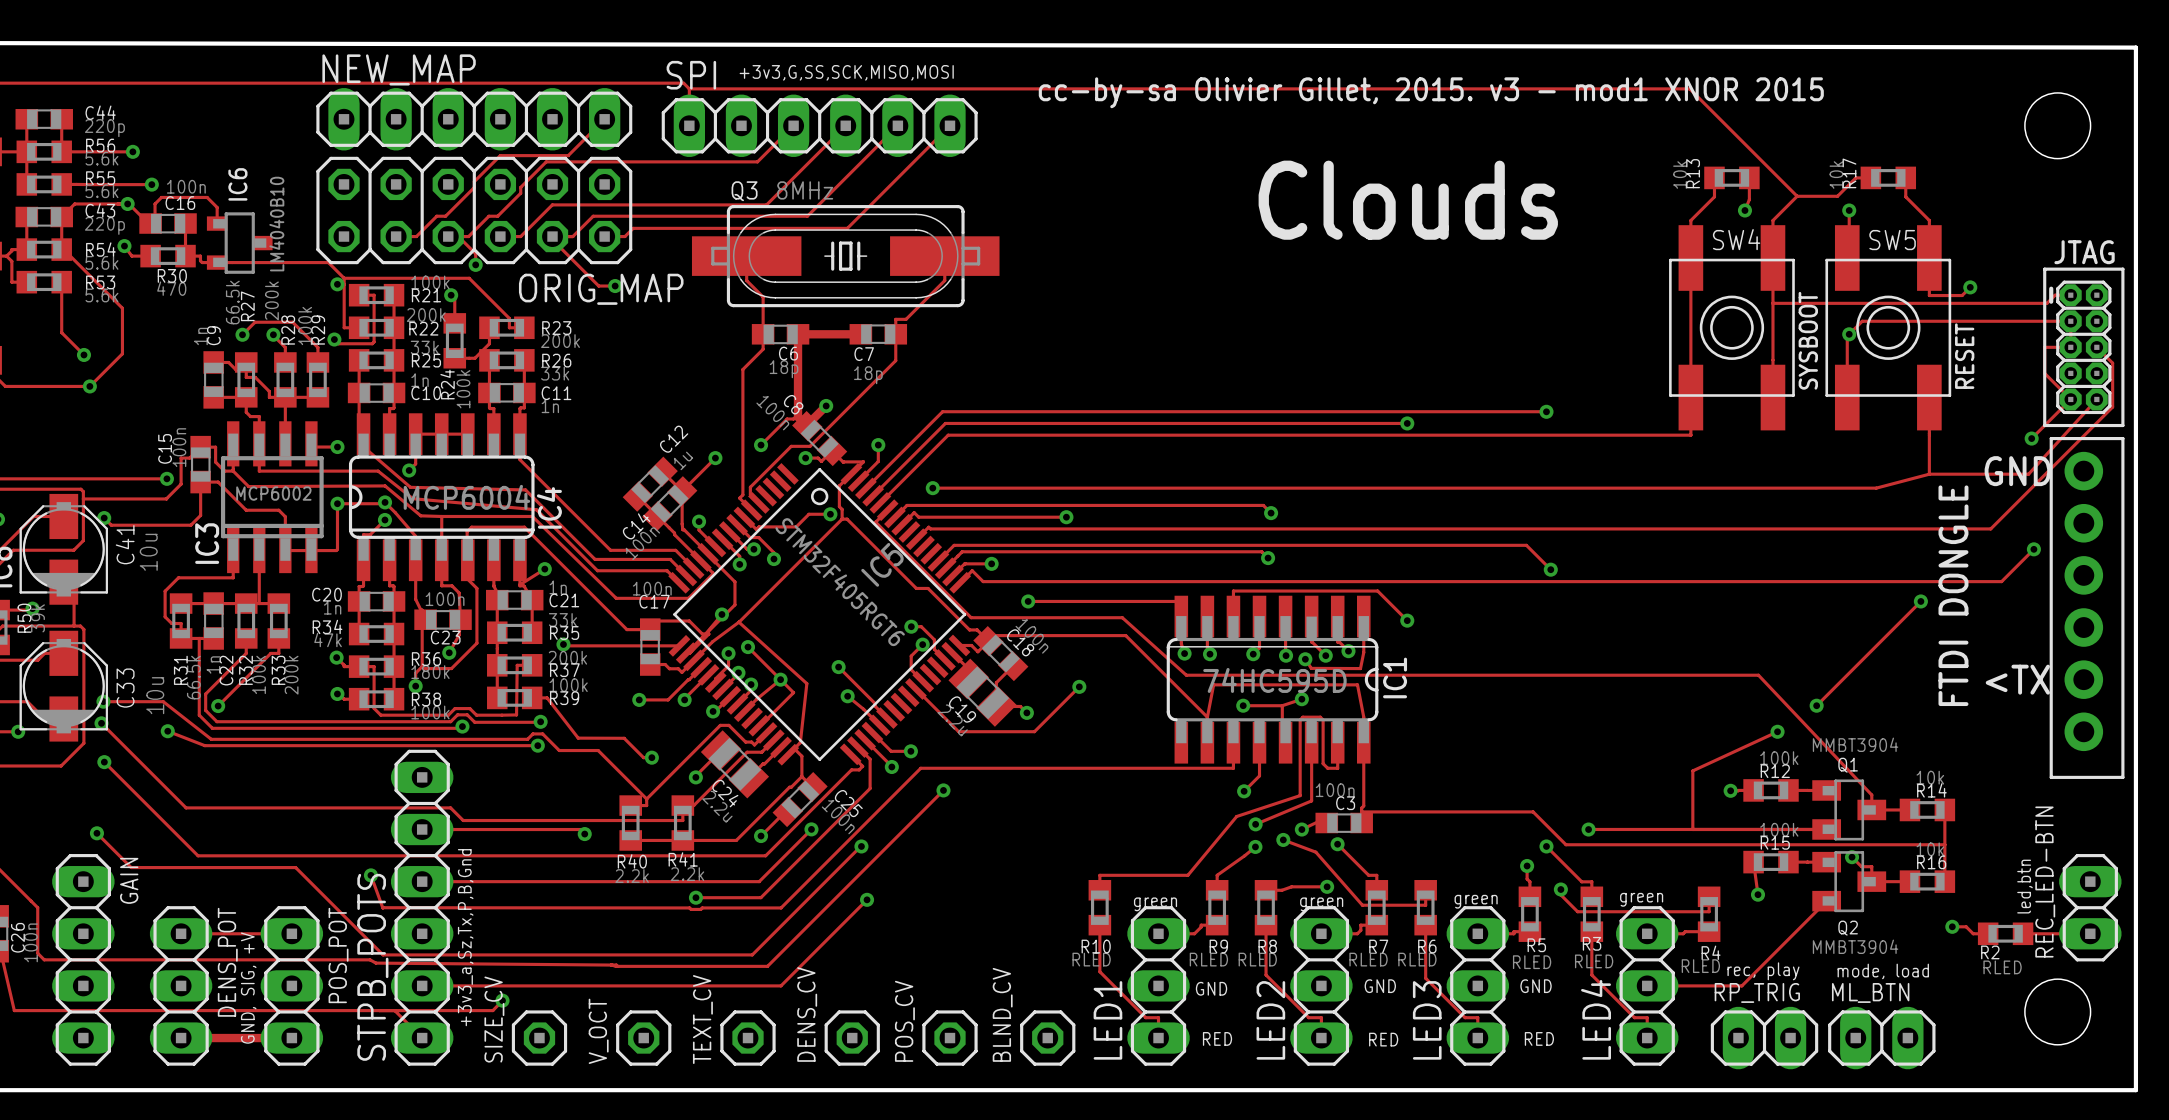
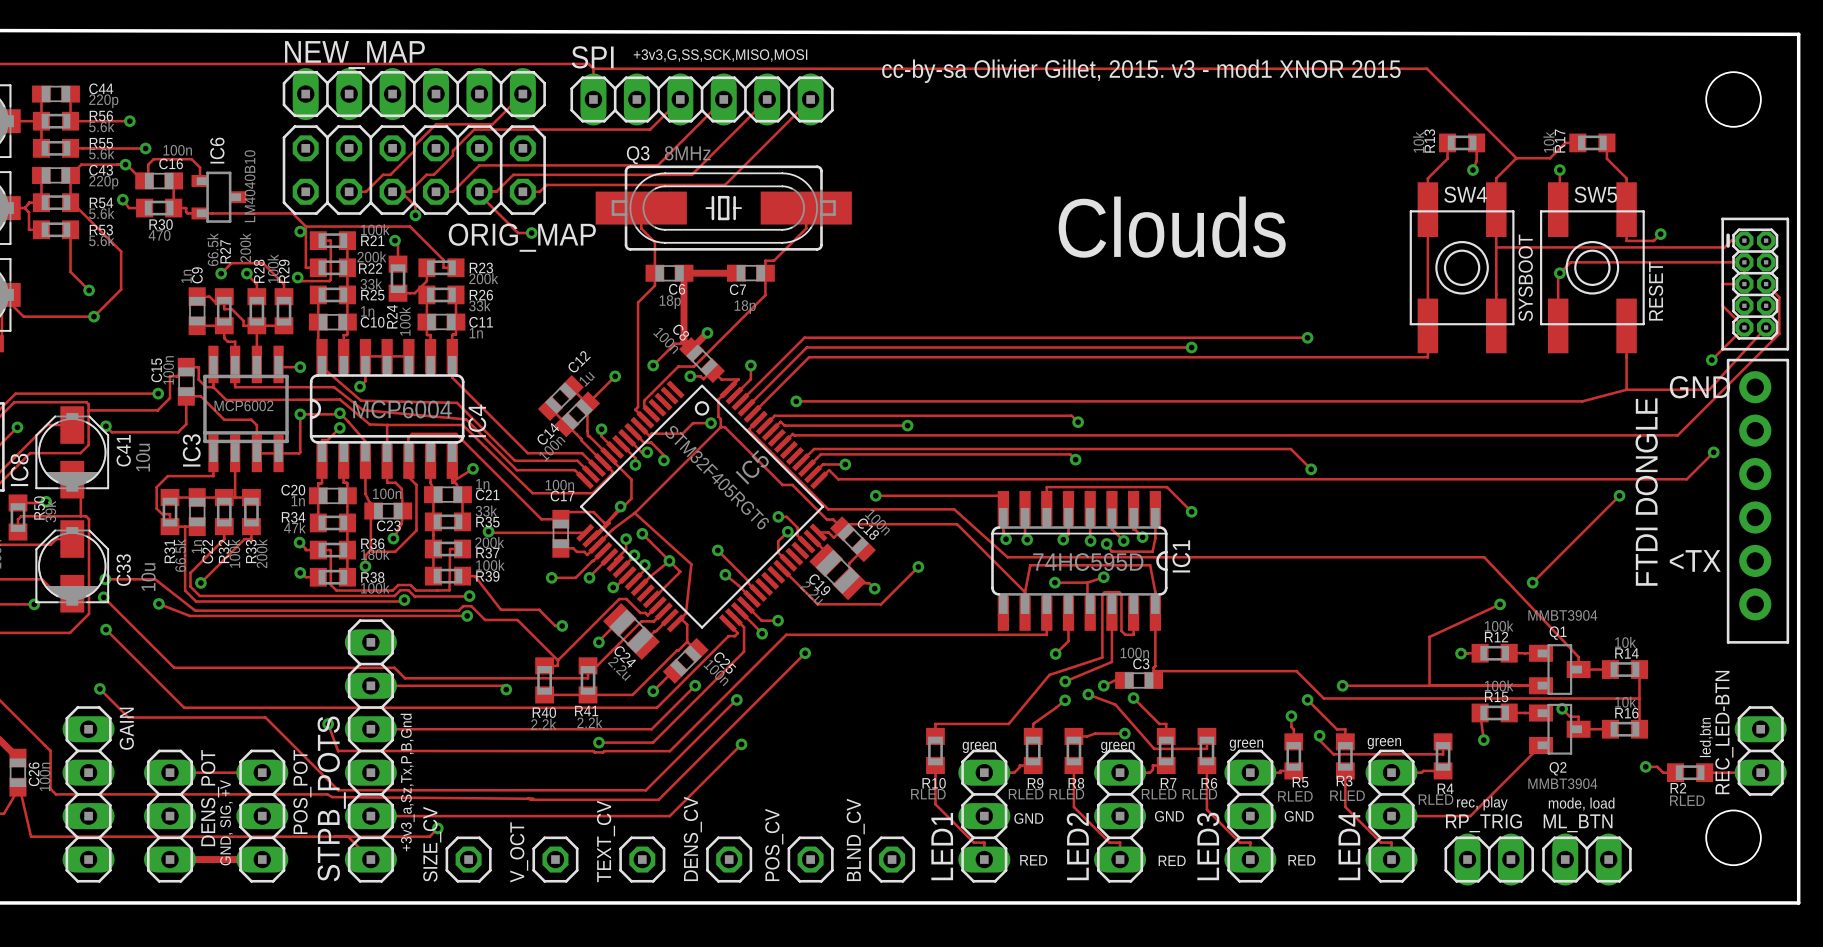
text position: Clouds (1408, 200) -> Clouds (1172, 227)
text: JTAG (2084, 252) -> none

